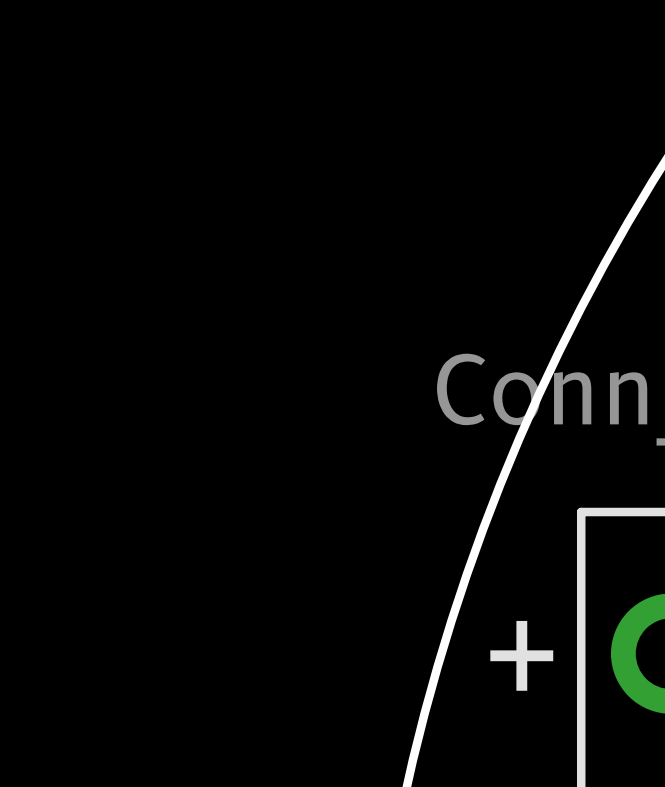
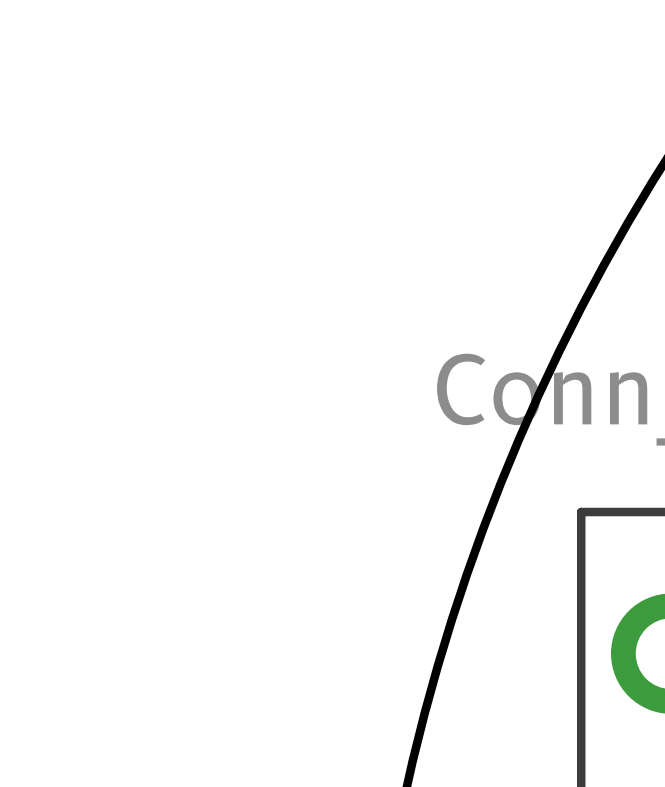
text: + (521, 655) -> none

